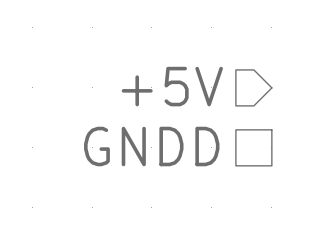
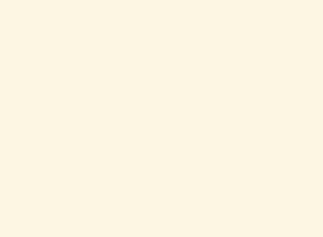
hierarchical label: +5V (172, 86) -> none
hierarchical label: GNDD (151, 146) -> none

